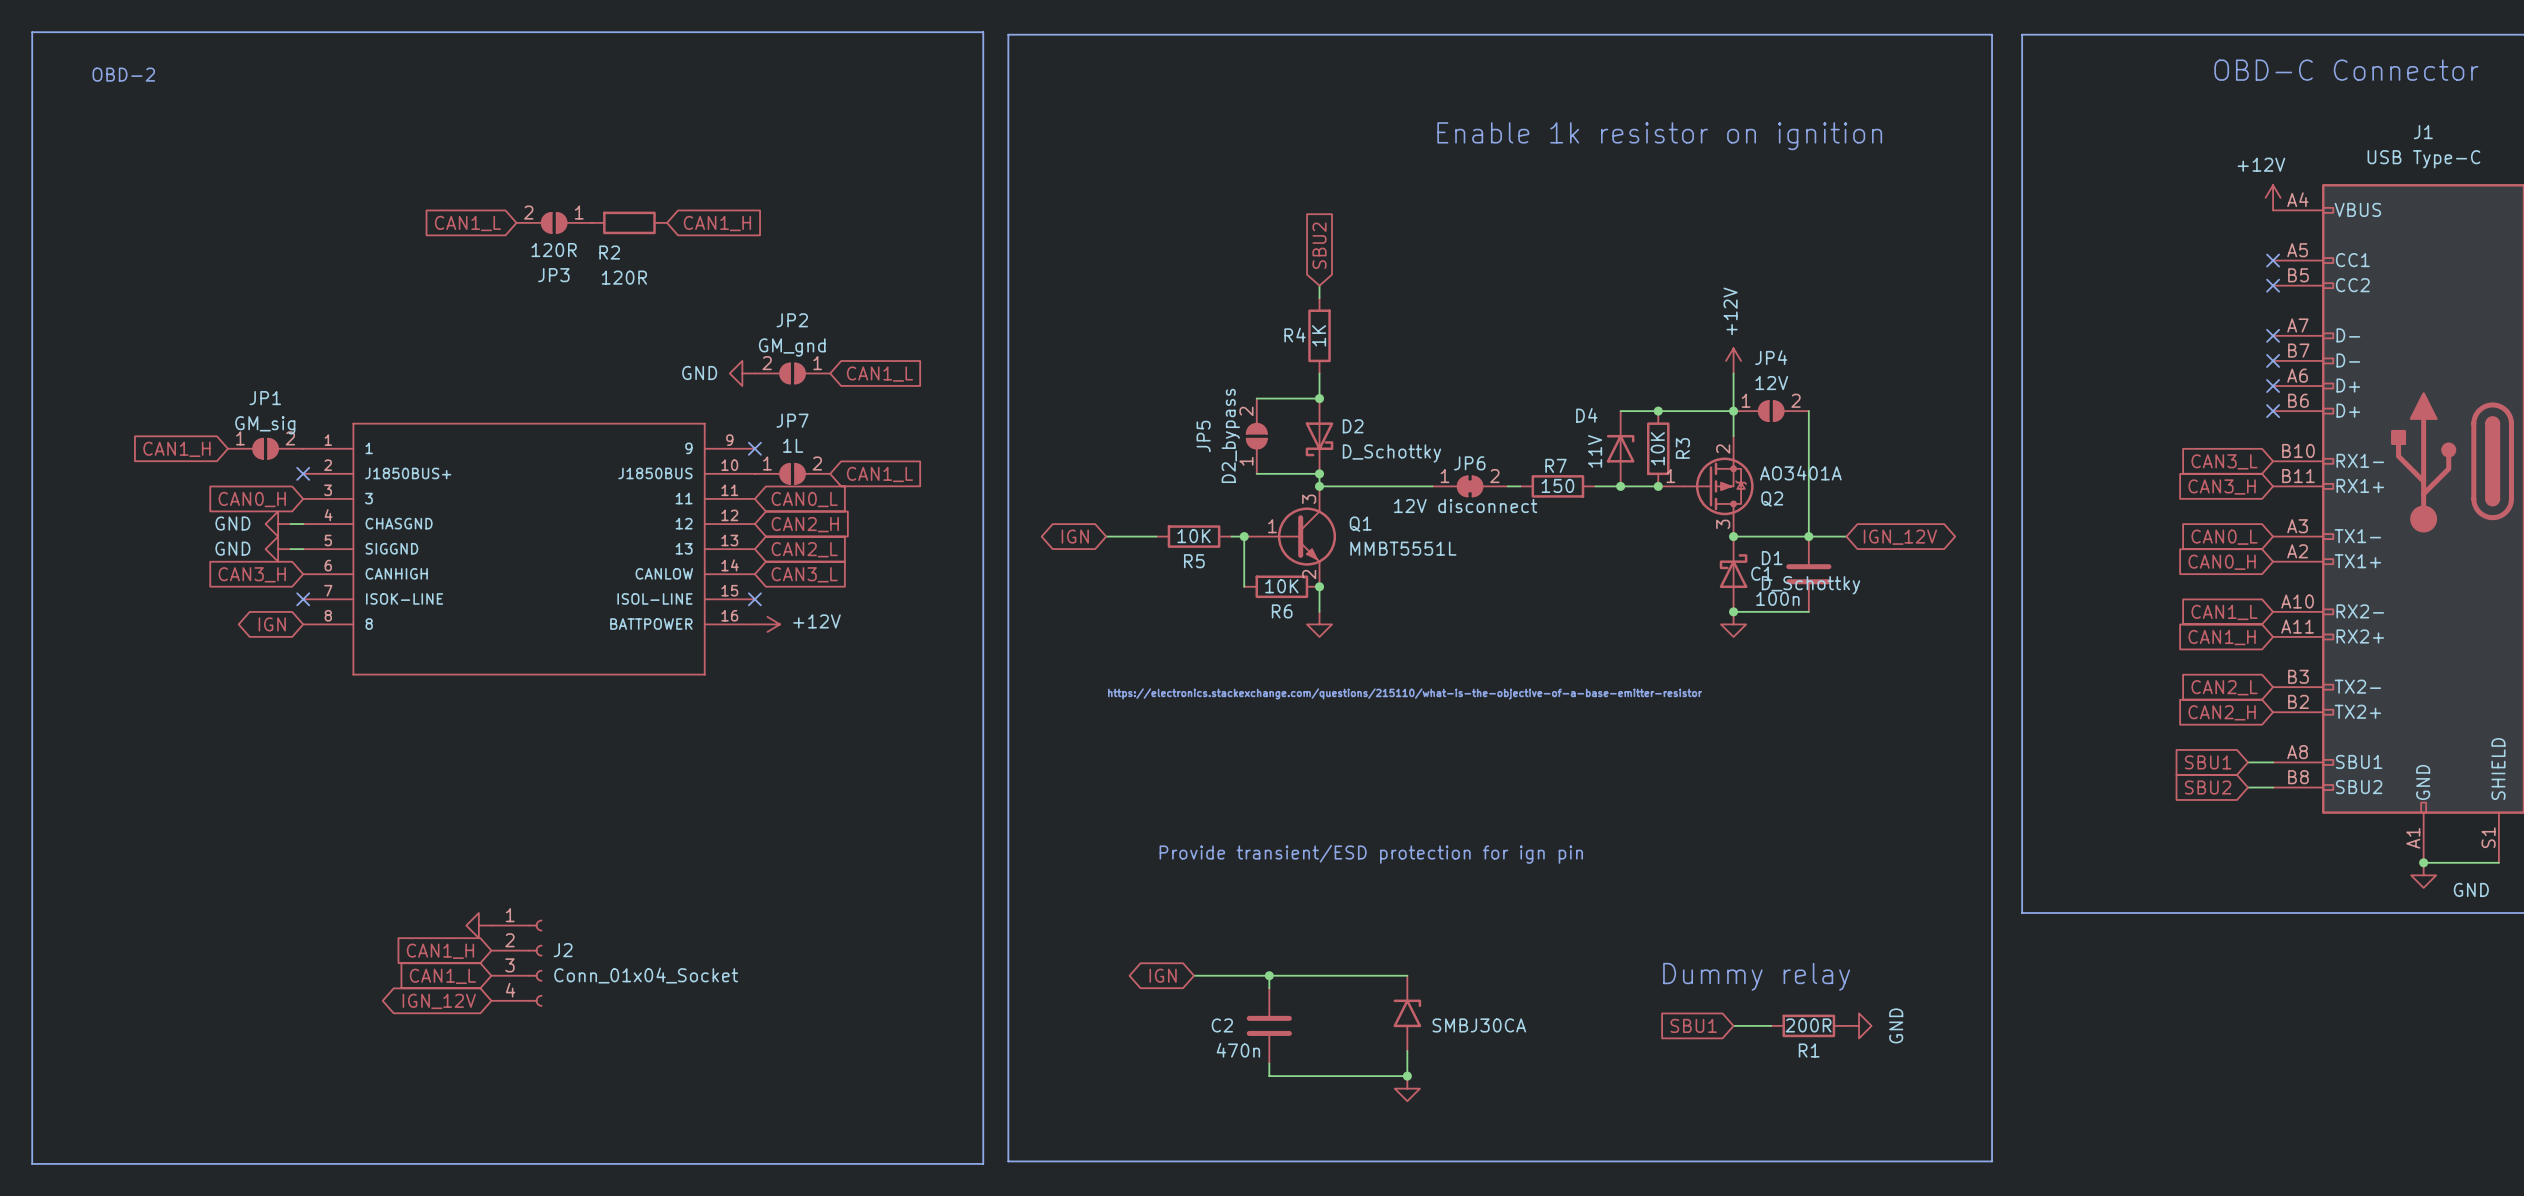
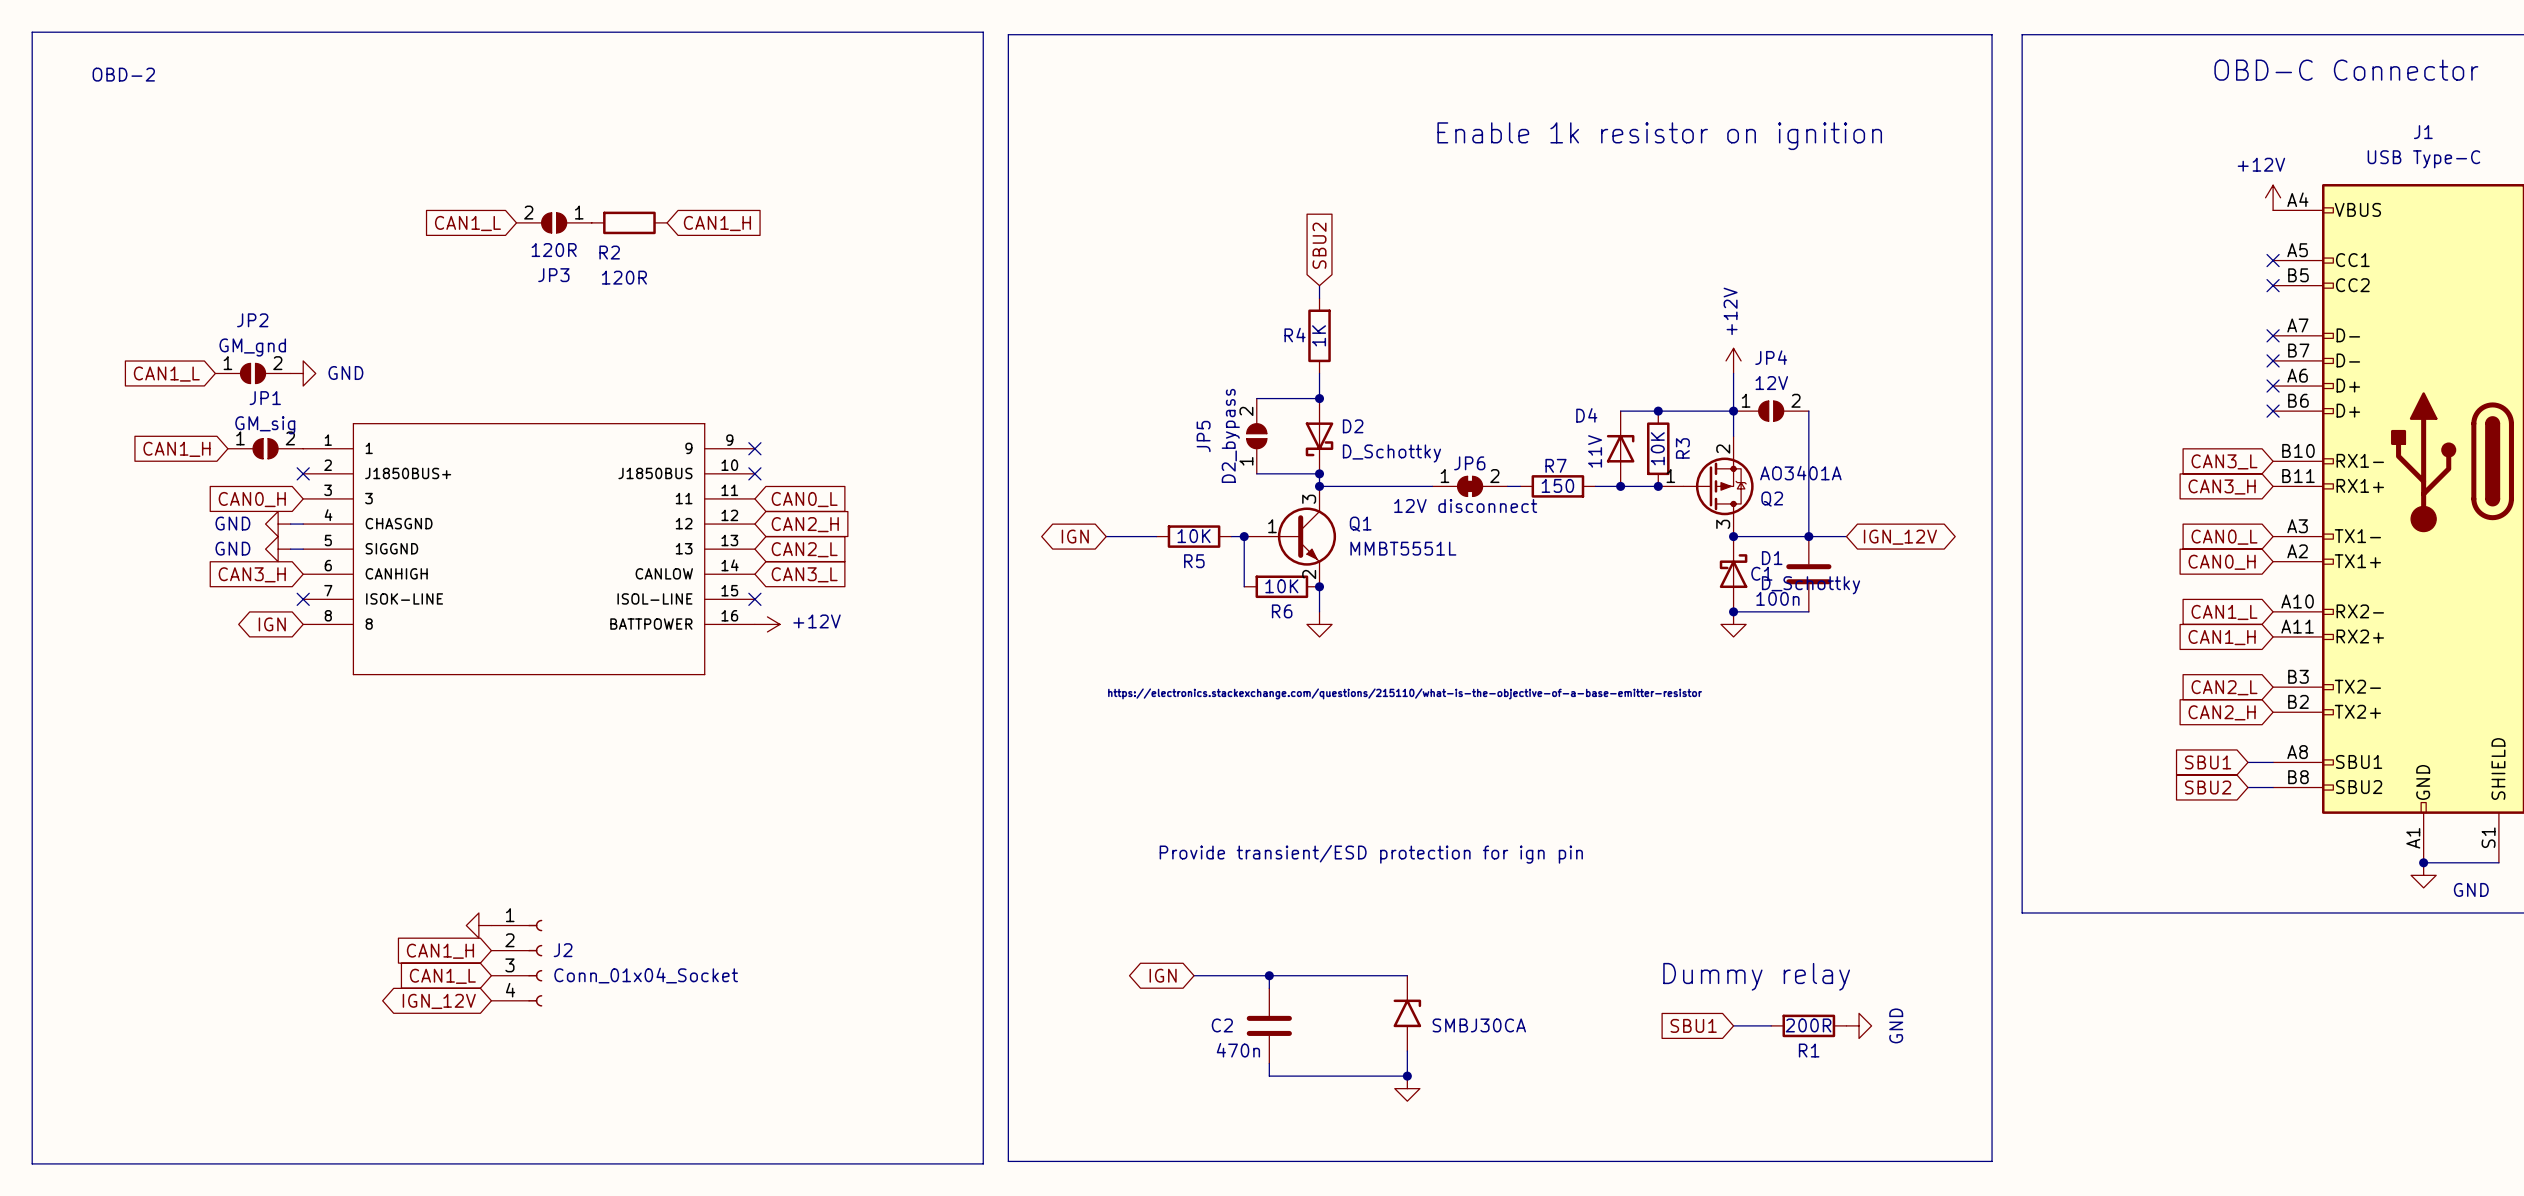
power symbol: none -> GND (303, 373)
power symbol: GND (742, 373) -> none
JP2 rotation: 0° (792, 373) -> 180° (253, 373)
JP2 position: (792, 373) -> (253, 373)
global label: none -> CAN1_L (166, 374)
global label: CAN1_L (879, 374) -> none
no-connect mark: none -> (754, 473)
JP7: 1L (792, 473) -> none
global label: CAN1_L (879, 474) -> none

